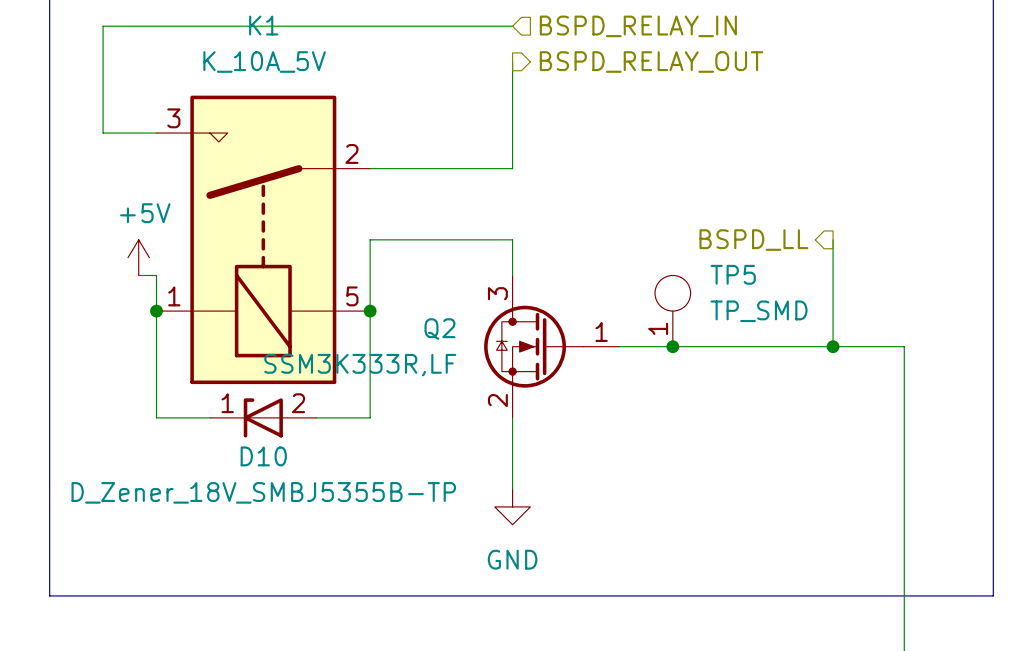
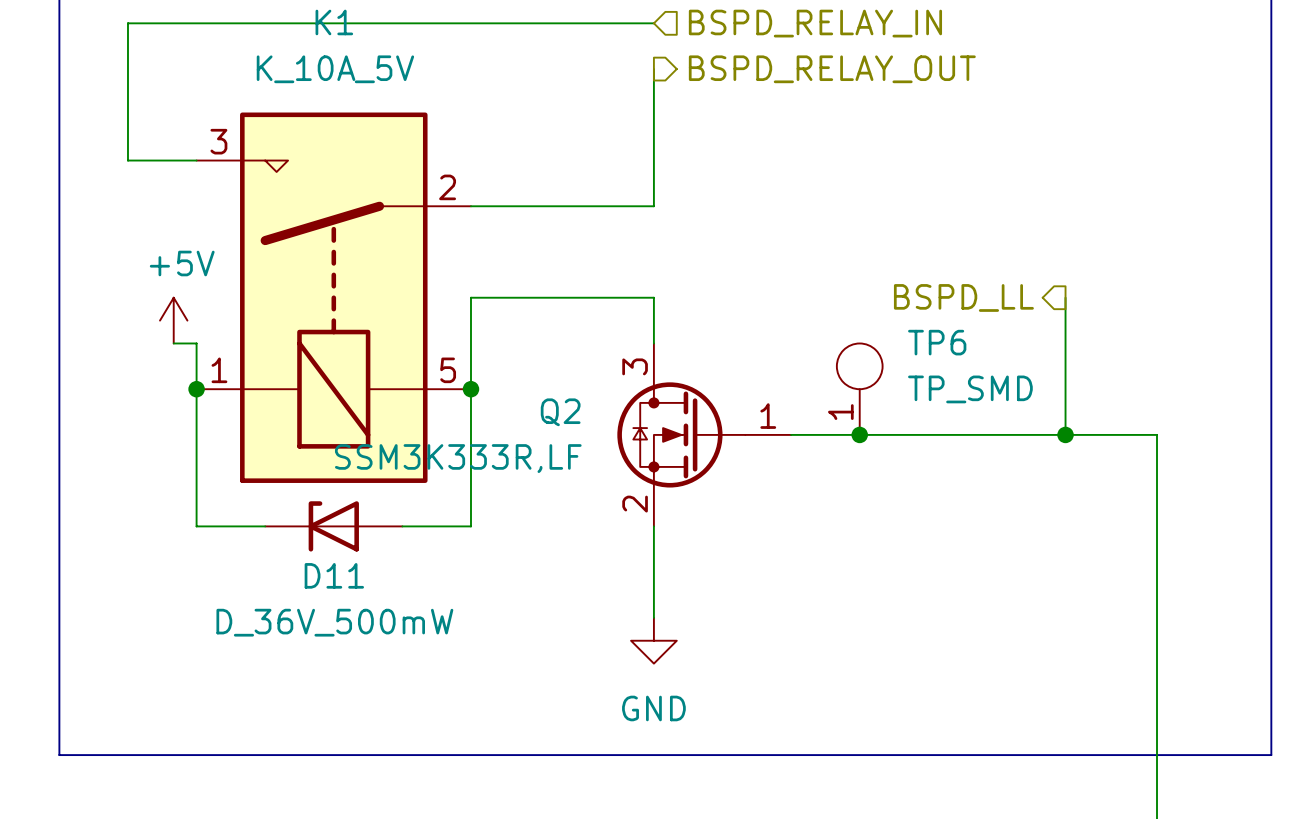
TP5 name: TP5 (733, 274) -> TP6 (937, 342)
D10 pin number: 1 (227, 403) -> none
D10 pin number: 2 (298, 403) -> none
D10 name: D10 (263, 456) -> D11 (334, 575)
D10 value: D_Zener_18V_SMBJ5355B-TP (263, 492) -> D_36V_500mW (334, 622)

